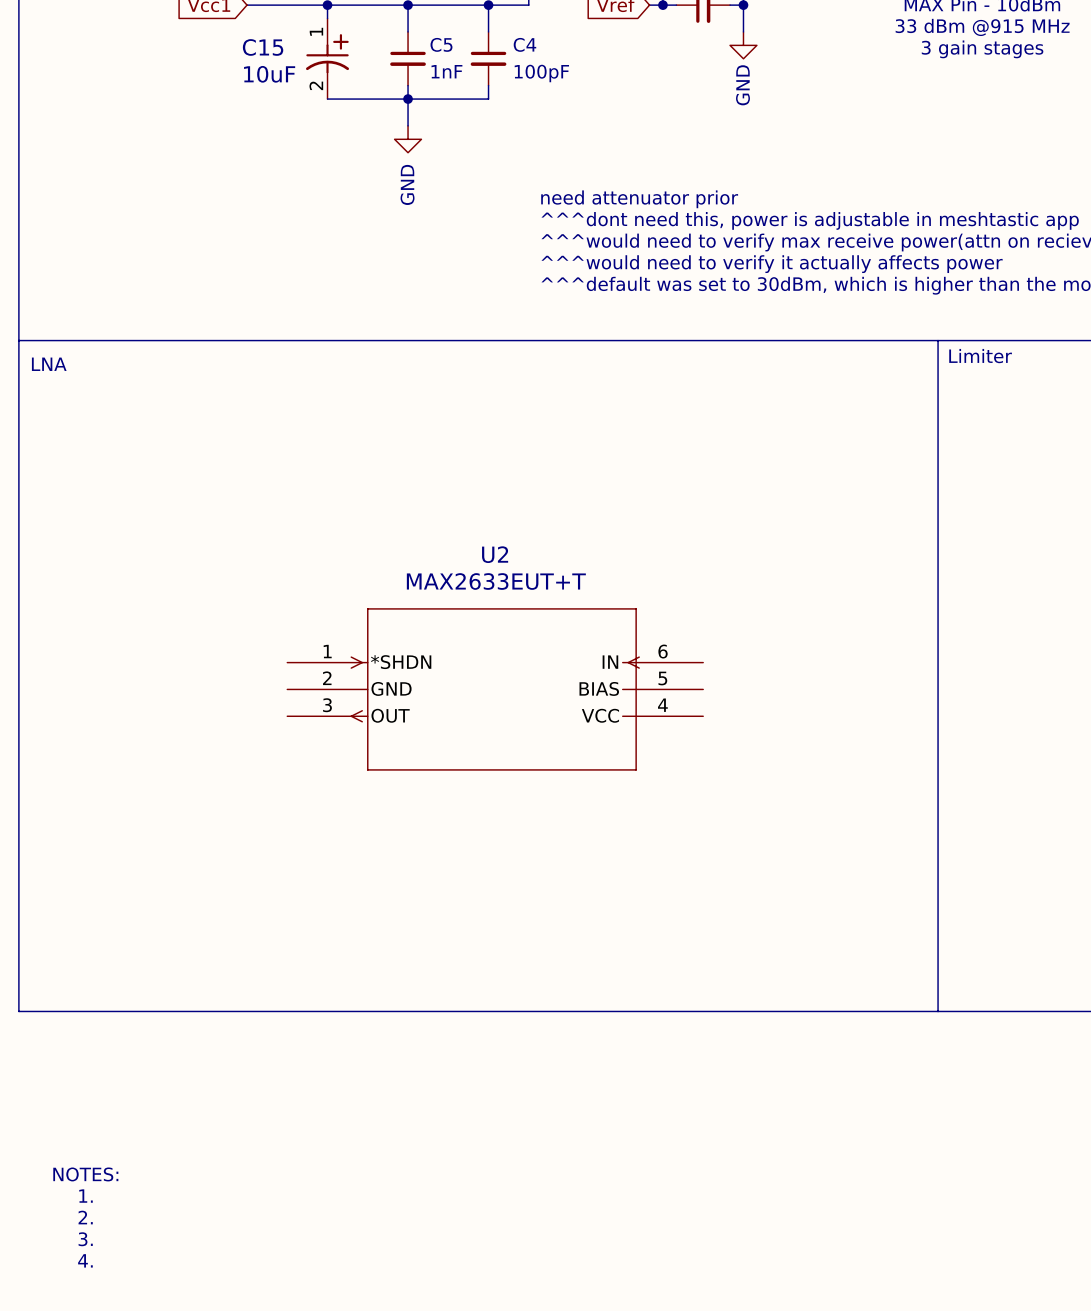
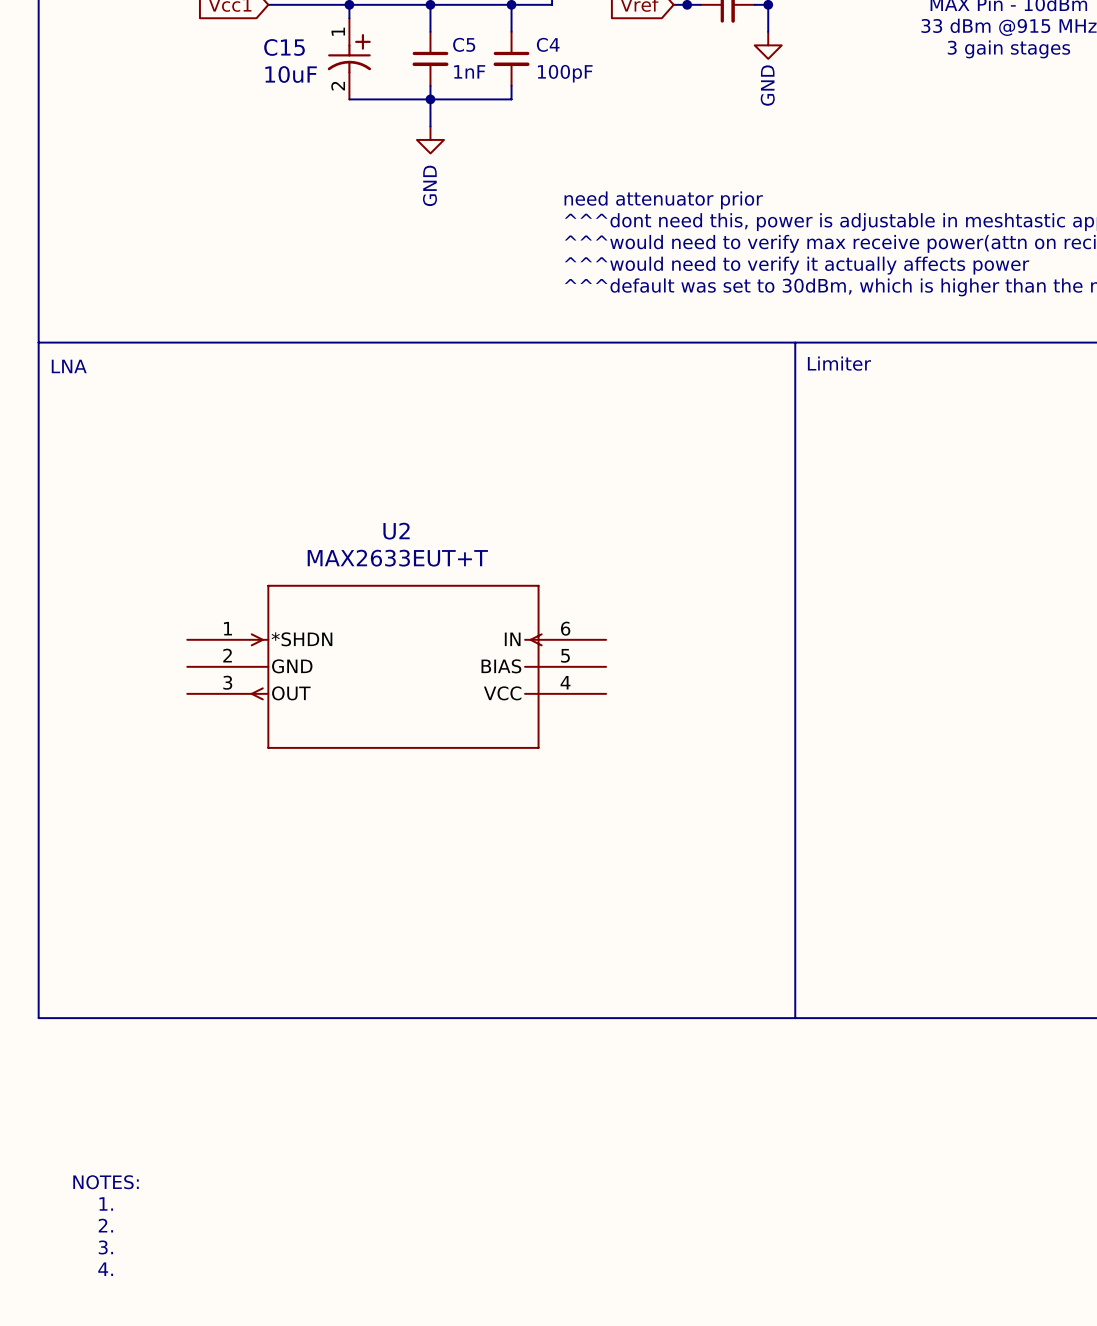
line: (938, 340) (938, 1011) -> (795, 342) (795, 1018)
text position: Limiter (980, 356) -> Limiter (839, 363)
U2 position: (495, 689) -> (396, 666)

